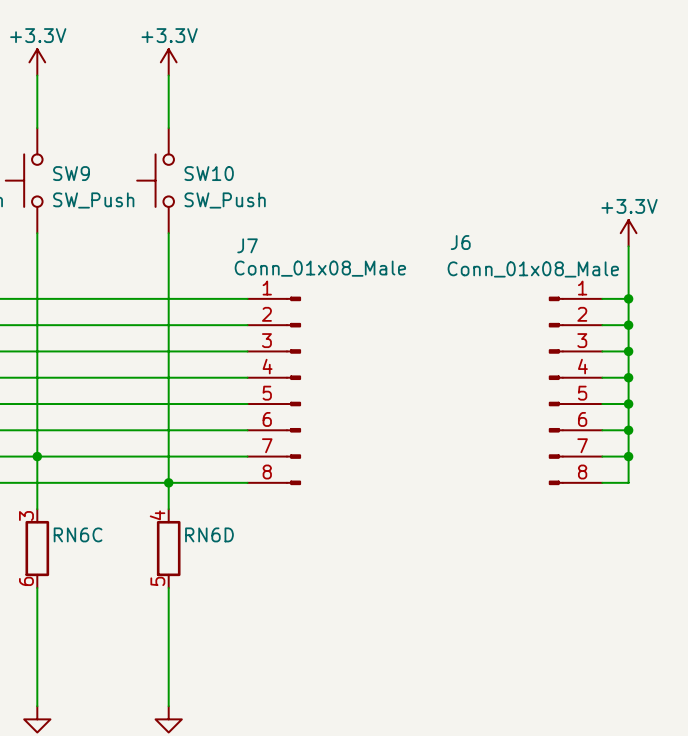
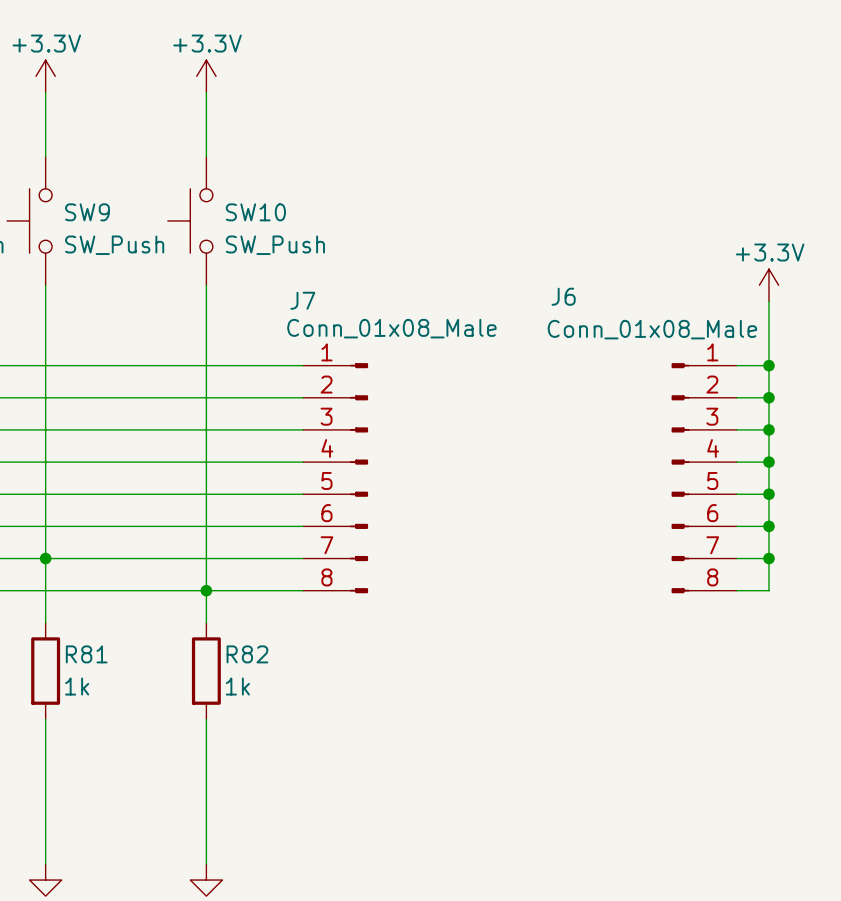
RN6D pin number: 4 (157, 515) -> none
RN6C pin number: 3 (26, 516) -> none
RN6C name: RN6C (78, 534) -> R81 (86, 654)
RN6D name: RN6D (209, 534) -> R82 (247, 654)
RN6C value: none -> 1k (77, 686)
RN6D value: none -> 1k (237, 686)
RN6C pin number: 6 (26, 581) -> none
RN6D pin number: 5 (157, 581) -> none

